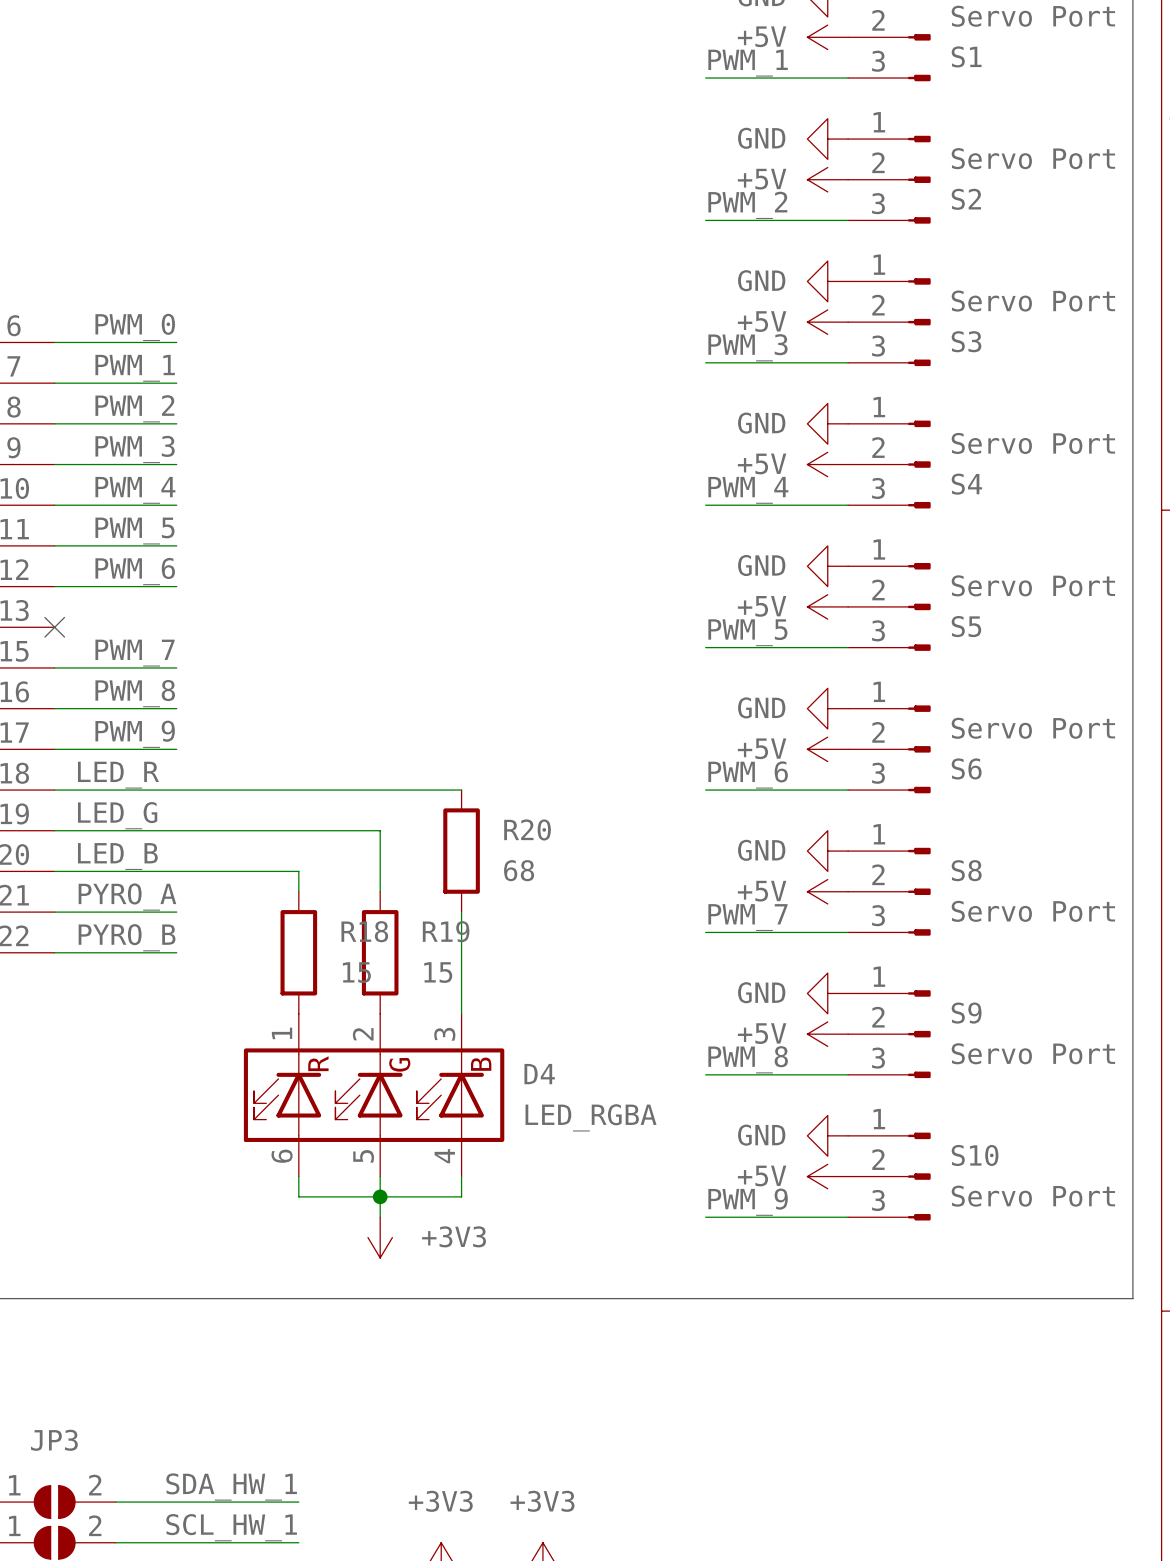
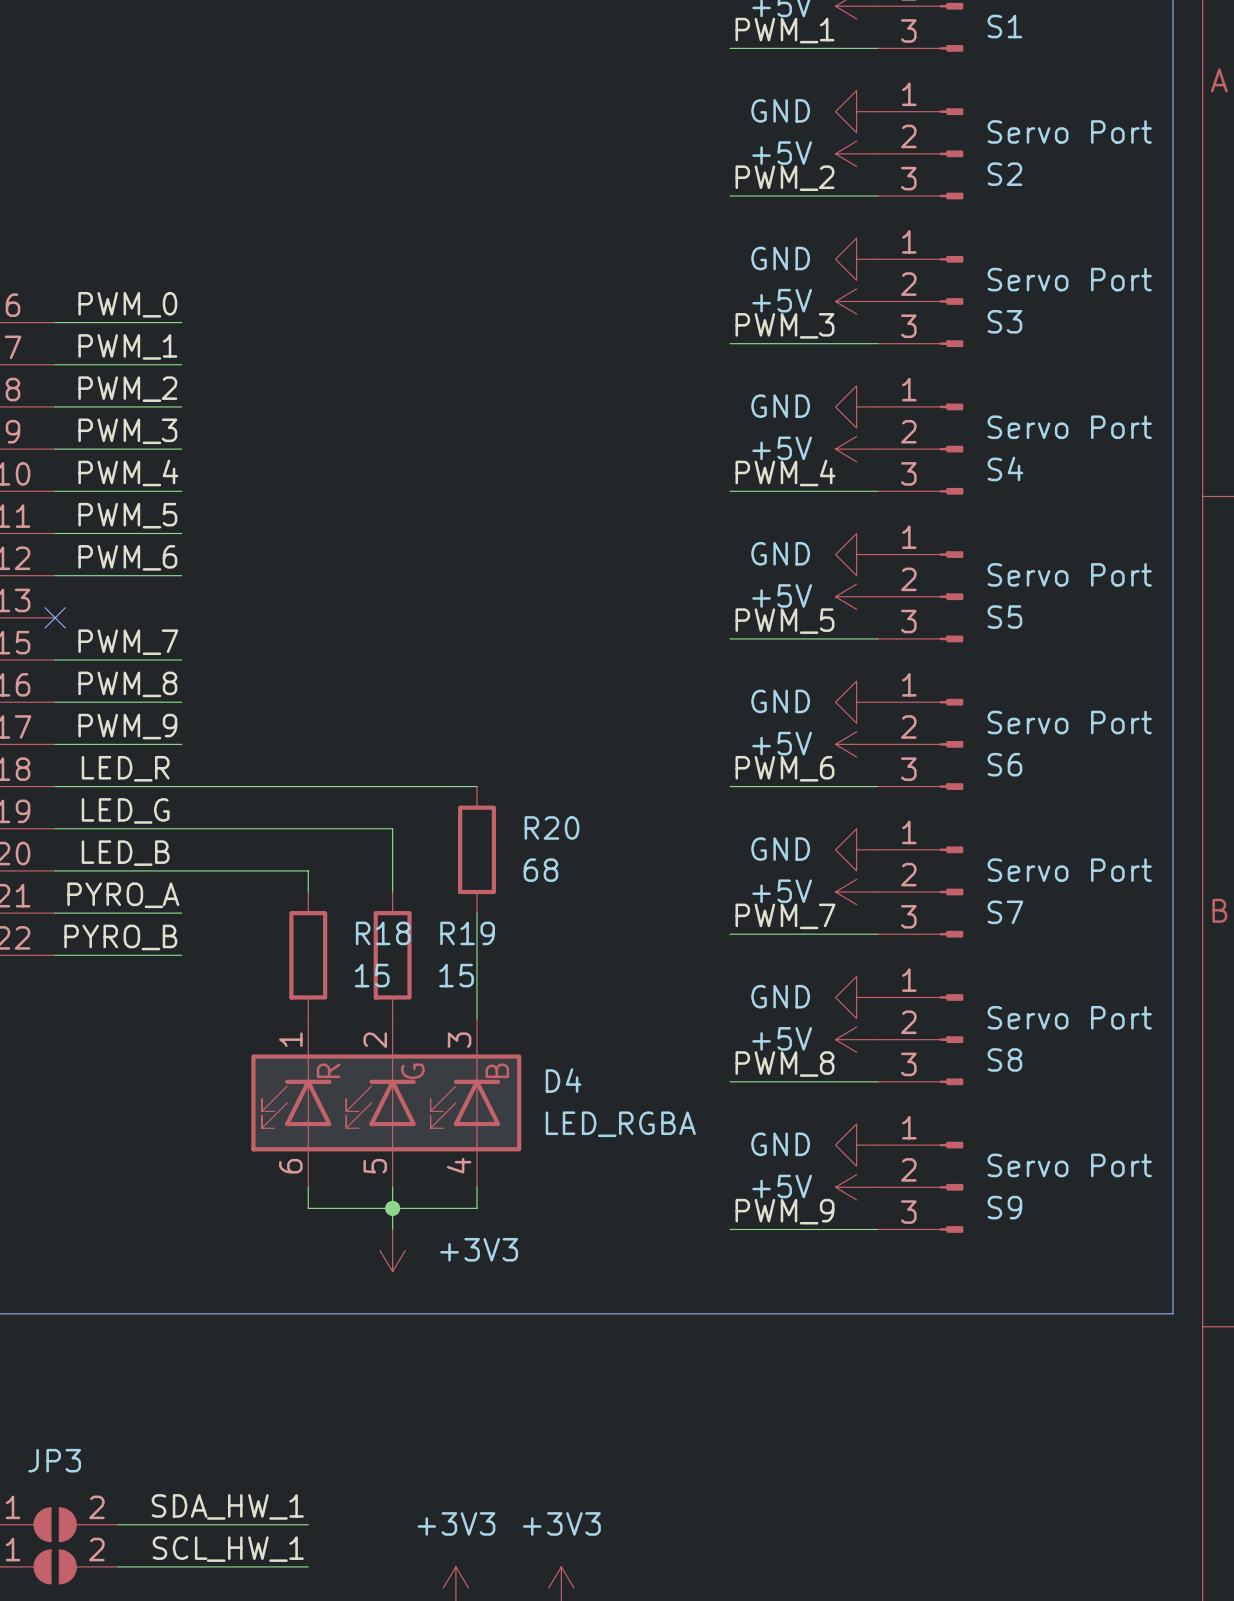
S8 name: S8 (966, 870) -> S7 (1005, 912)
S8 value position: Servo Port (1033, 911) -> Servo Port (1069, 870)
S9 name: S9 (966, 1013) -> S8 (1004, 1059)
S9 value position: Servo Port (1033, 1053) -> Servo Port (1069, 1017)
S10 name: S10 (975, 1155) -> S9 (1004, 1207)
S10 value position: Servo Port (1033, 1196) -> Servo Port (1069, 1165)

